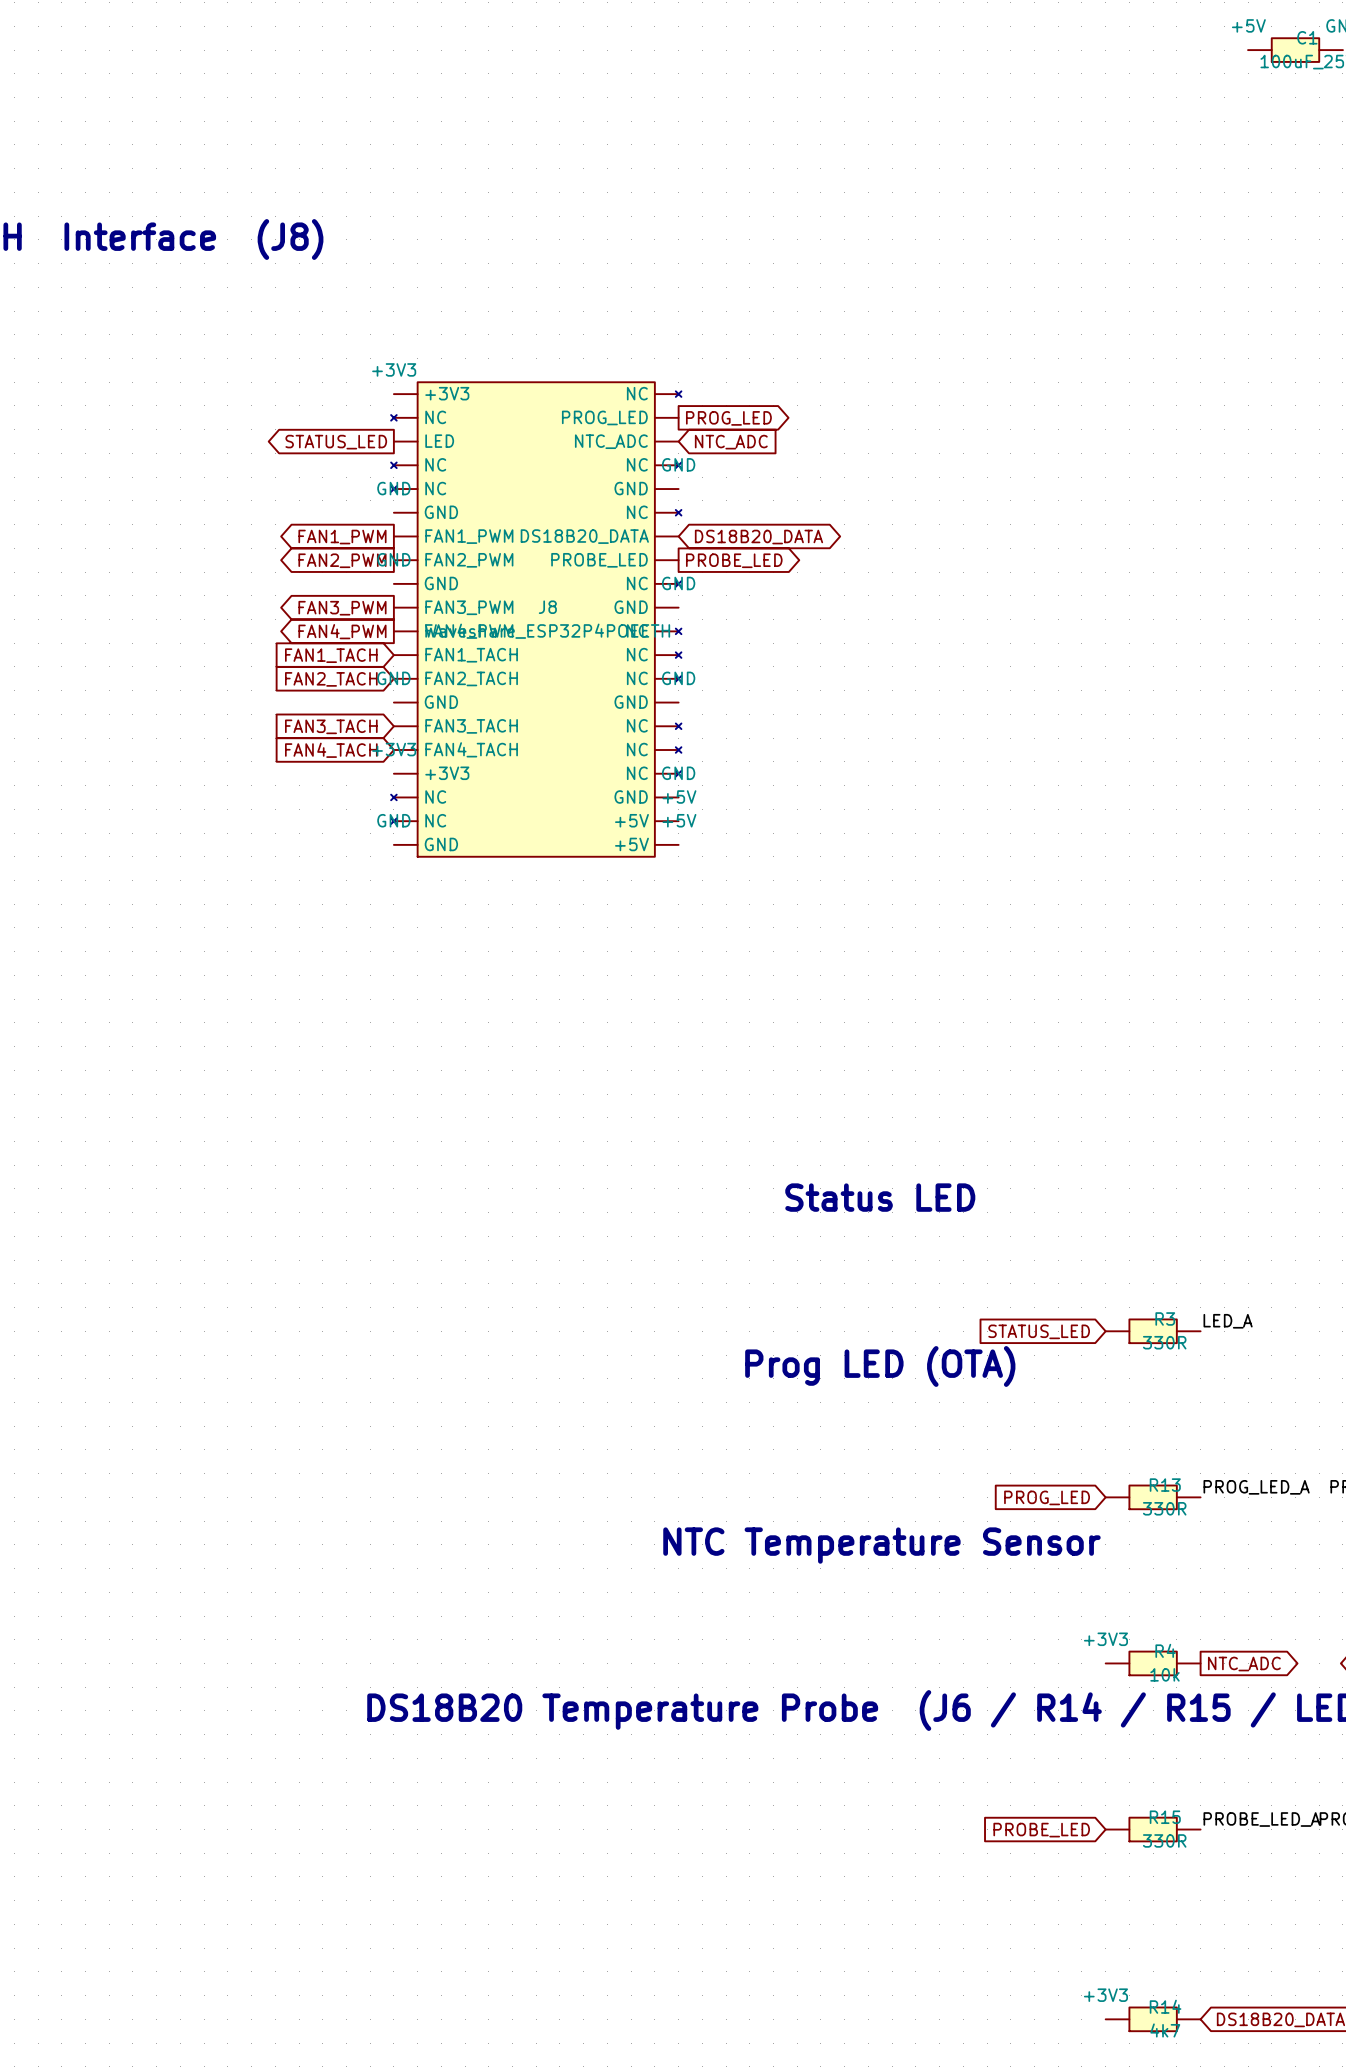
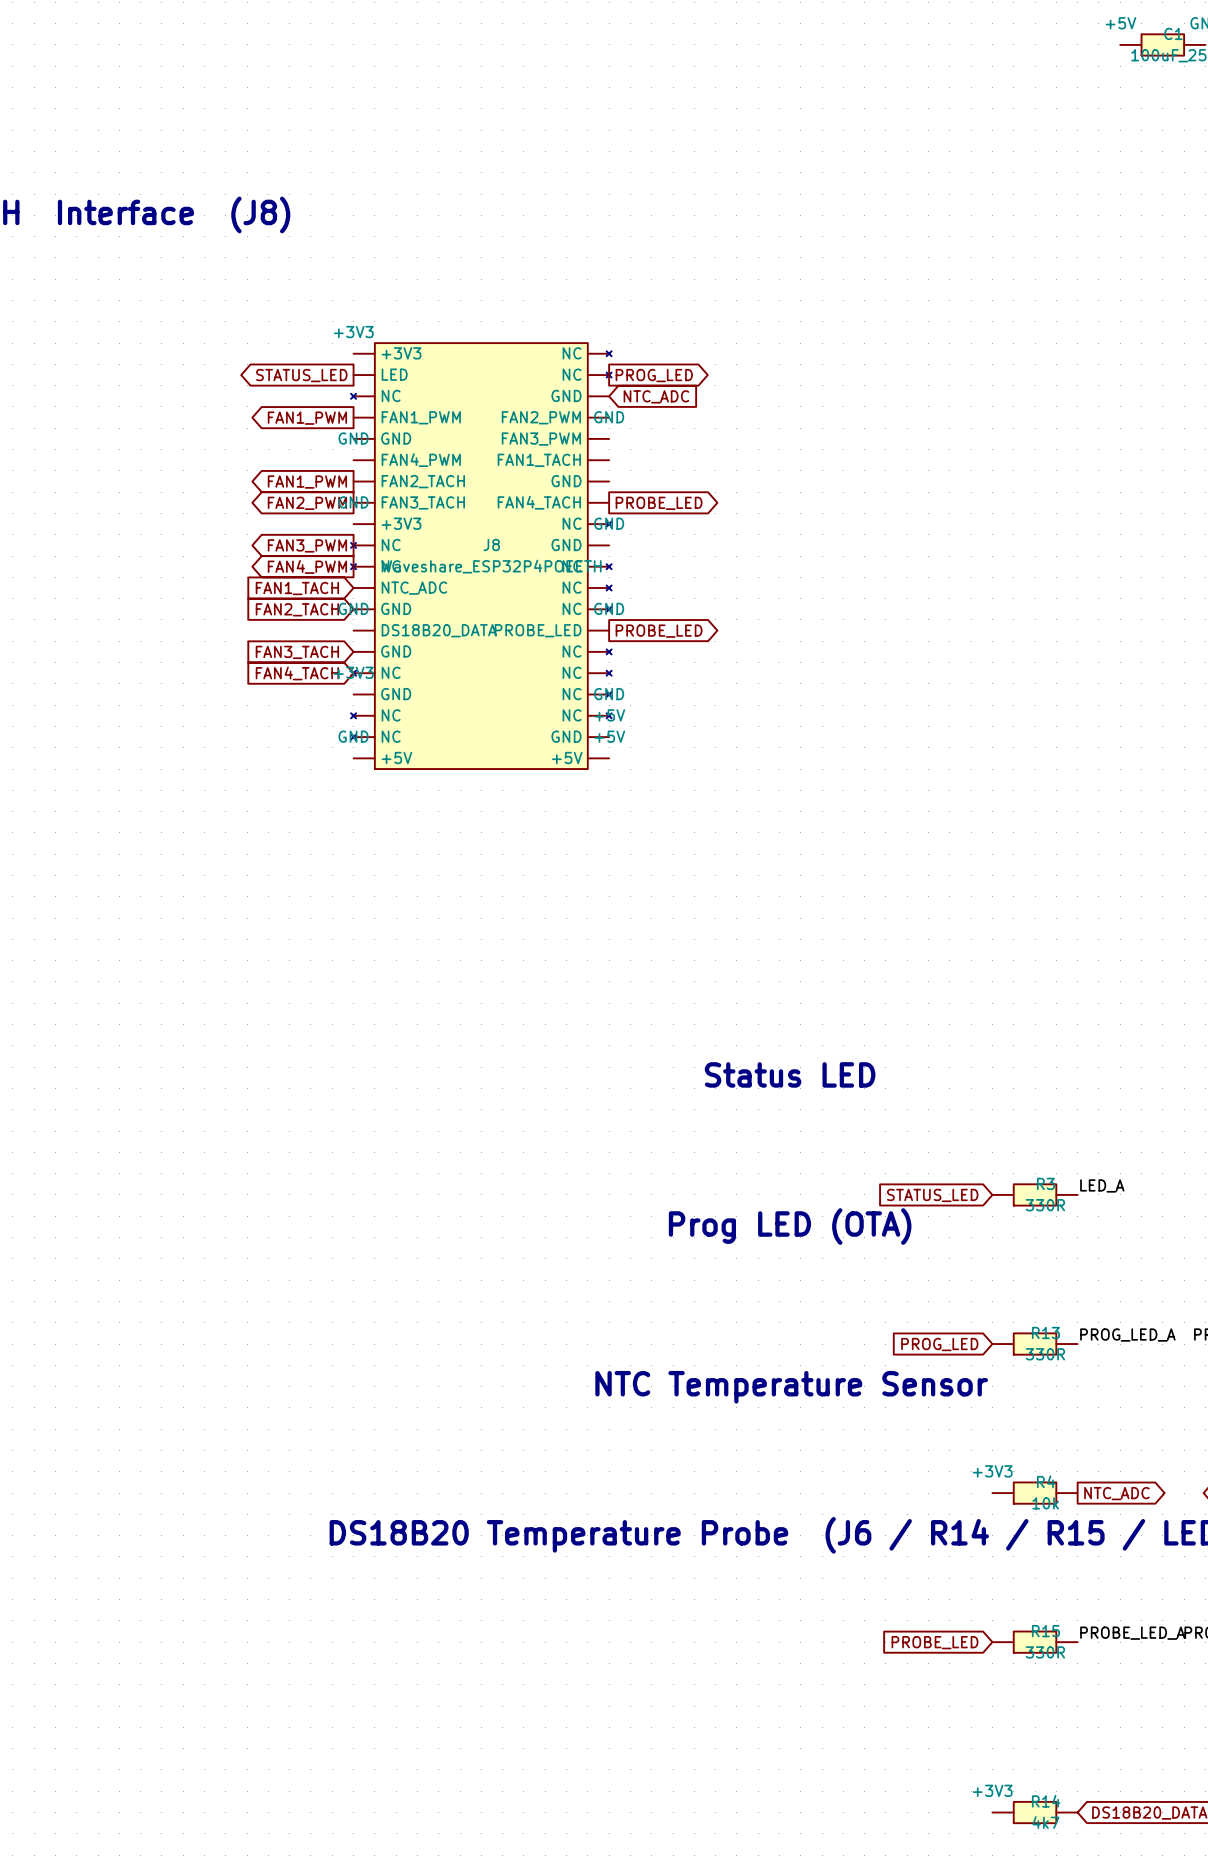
J8 symbol: [391, 382, 682, 857] -> [351, 343, 612, 770]
global label position: STATUS_LED (336, 442) -> STATUS_LED (301, 375)
global label: none -> FAN1_PWM (307, 418)
global label: DS18B20_DATA (758, 537) -> none
global label: none -> PROBE_LED (659, 631)

